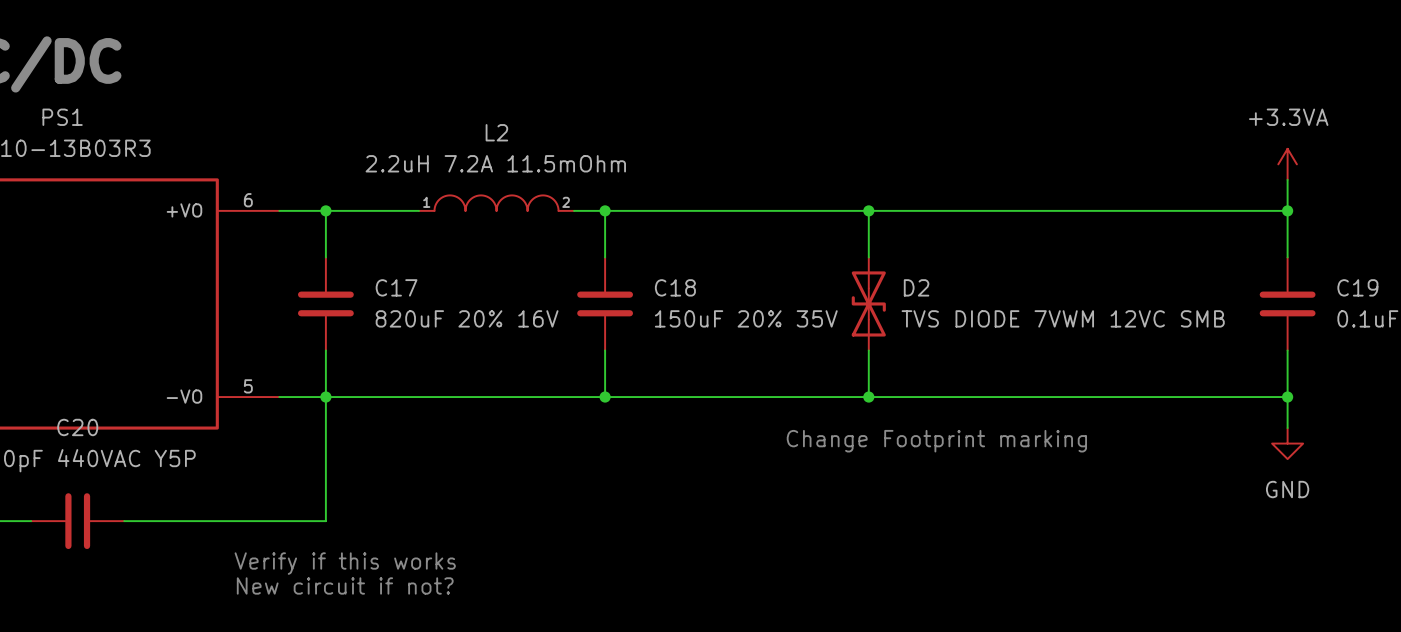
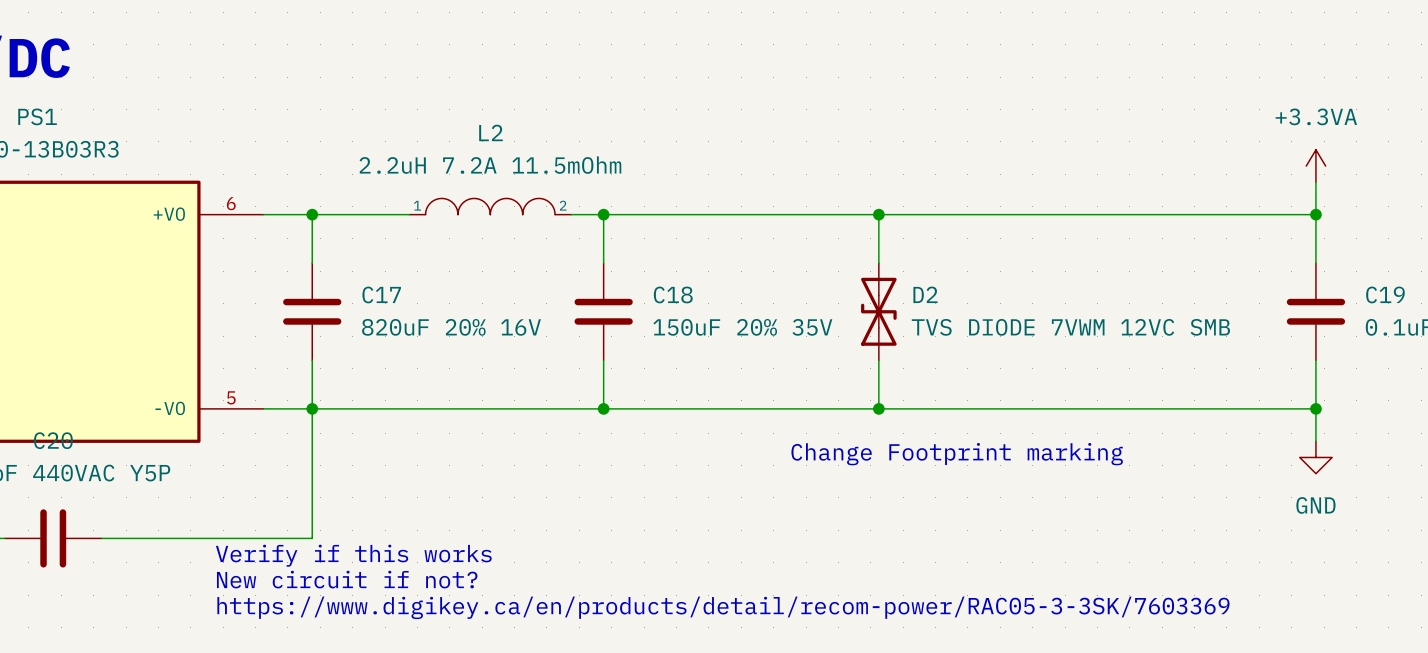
text: none -> Verify if this works (353, 555)
text: Verify if this works (345, 563) -> New circuit if not? (347, 579)
text: New circuit if not? (345, 585) -> https://www.digikey.ca/en/products/detail/recom-power/RAC05-3-3SK/7603369 (723, 607)

